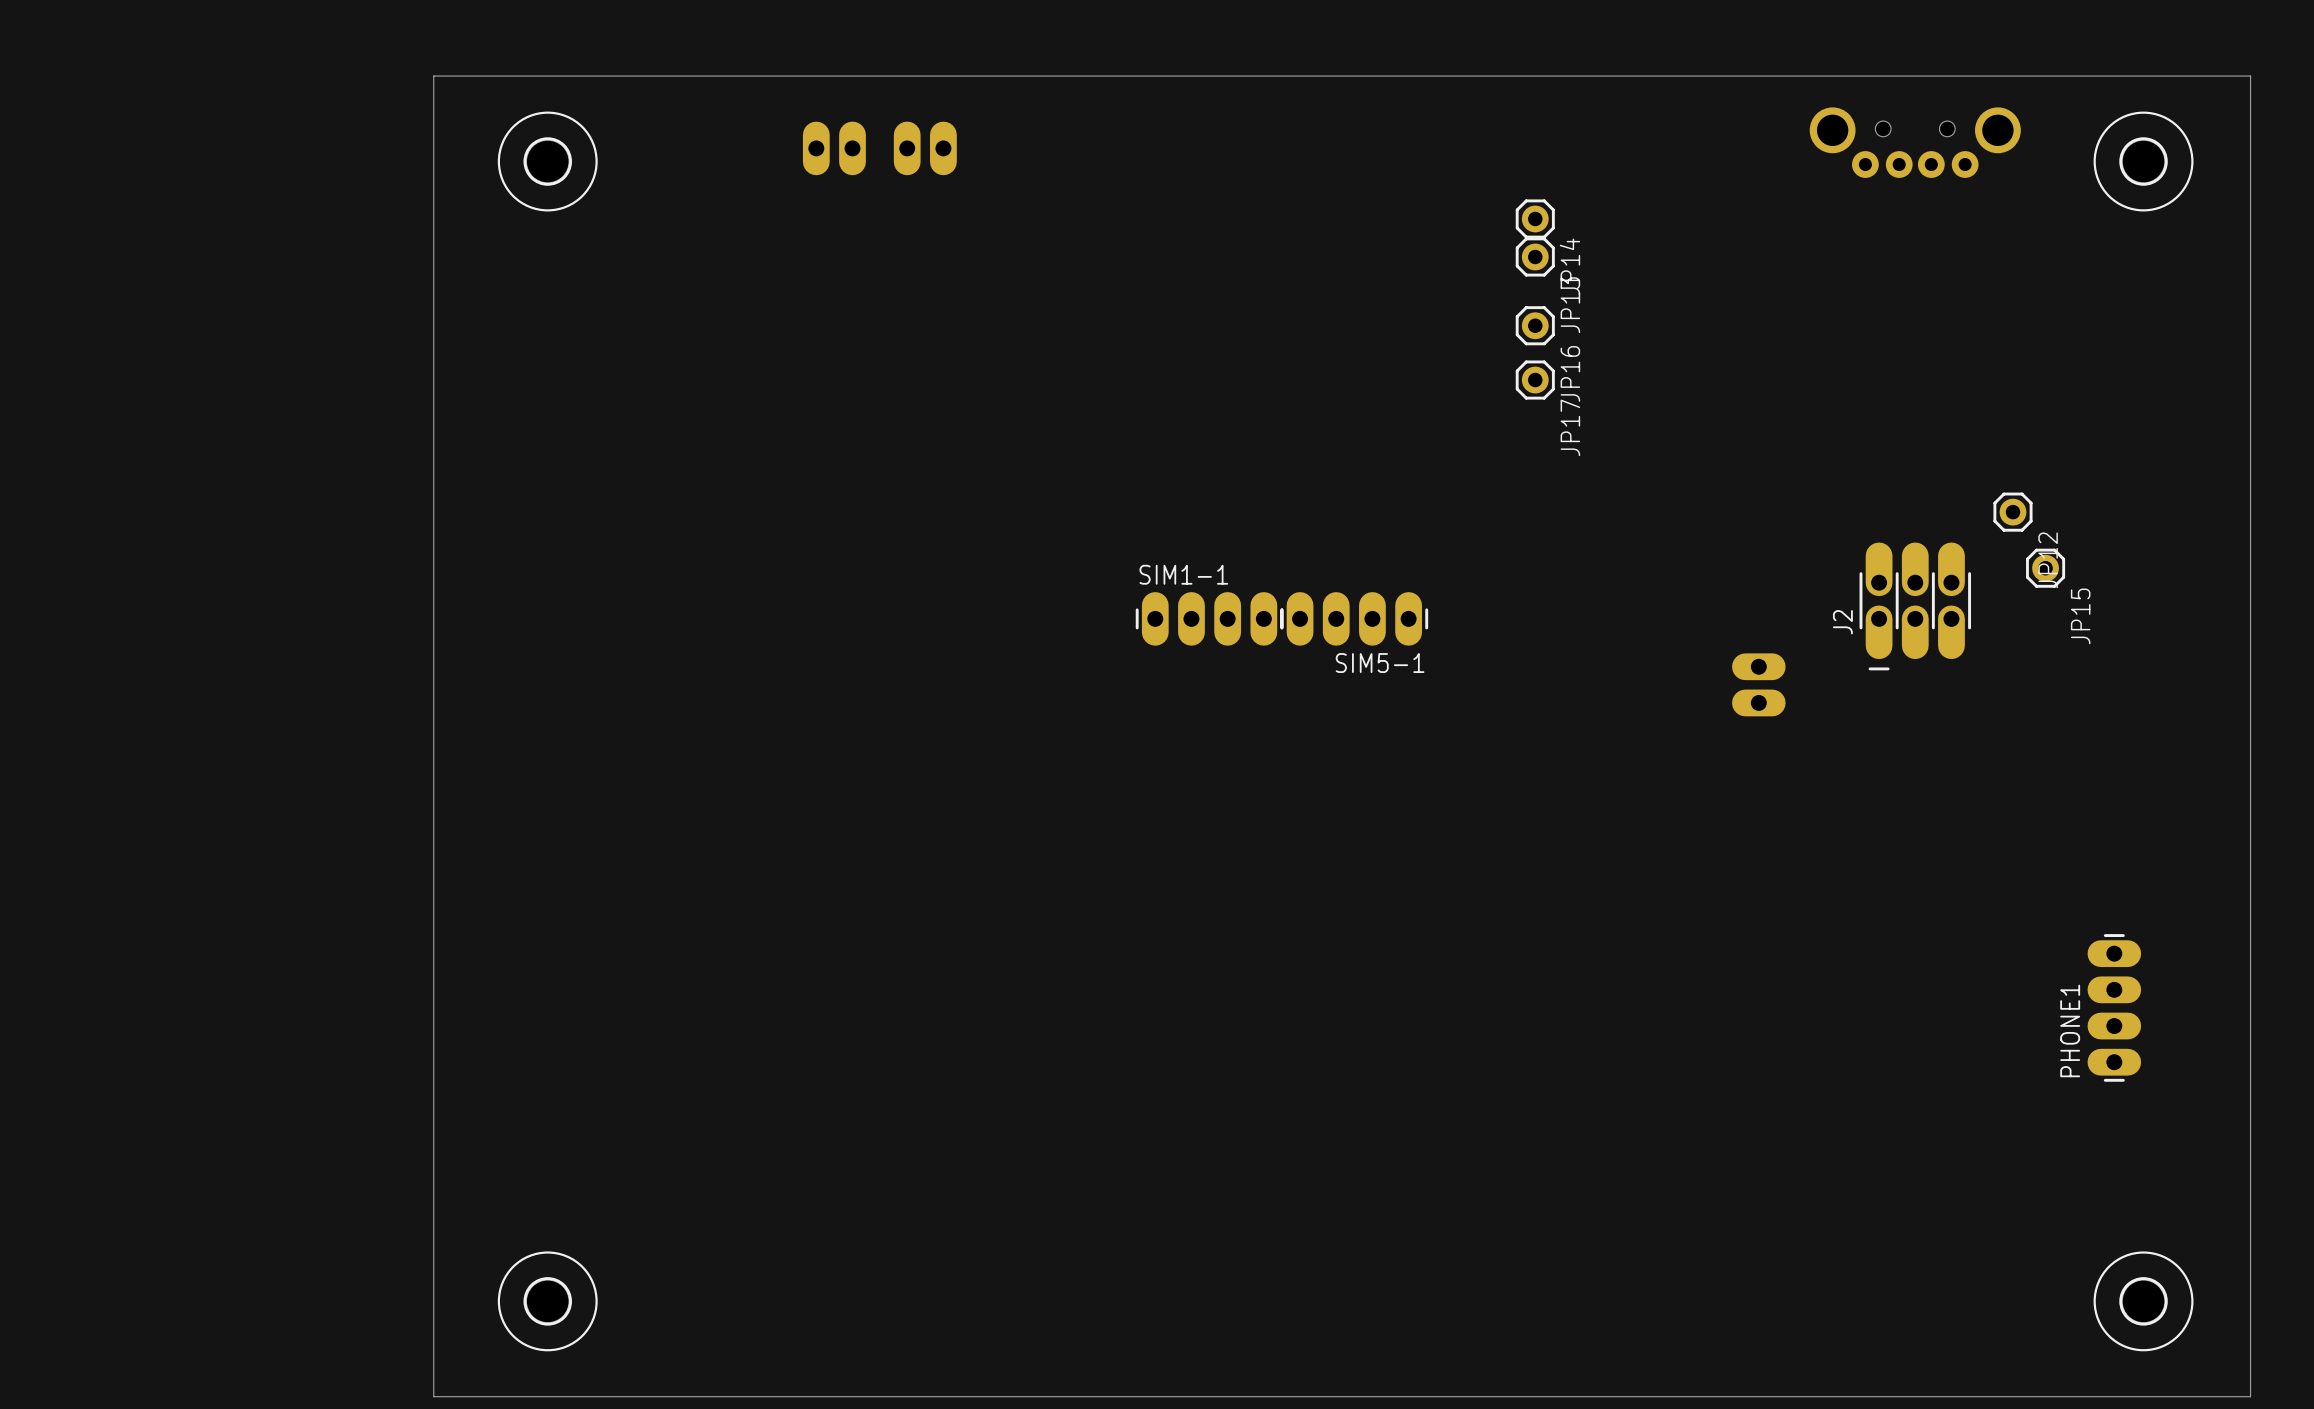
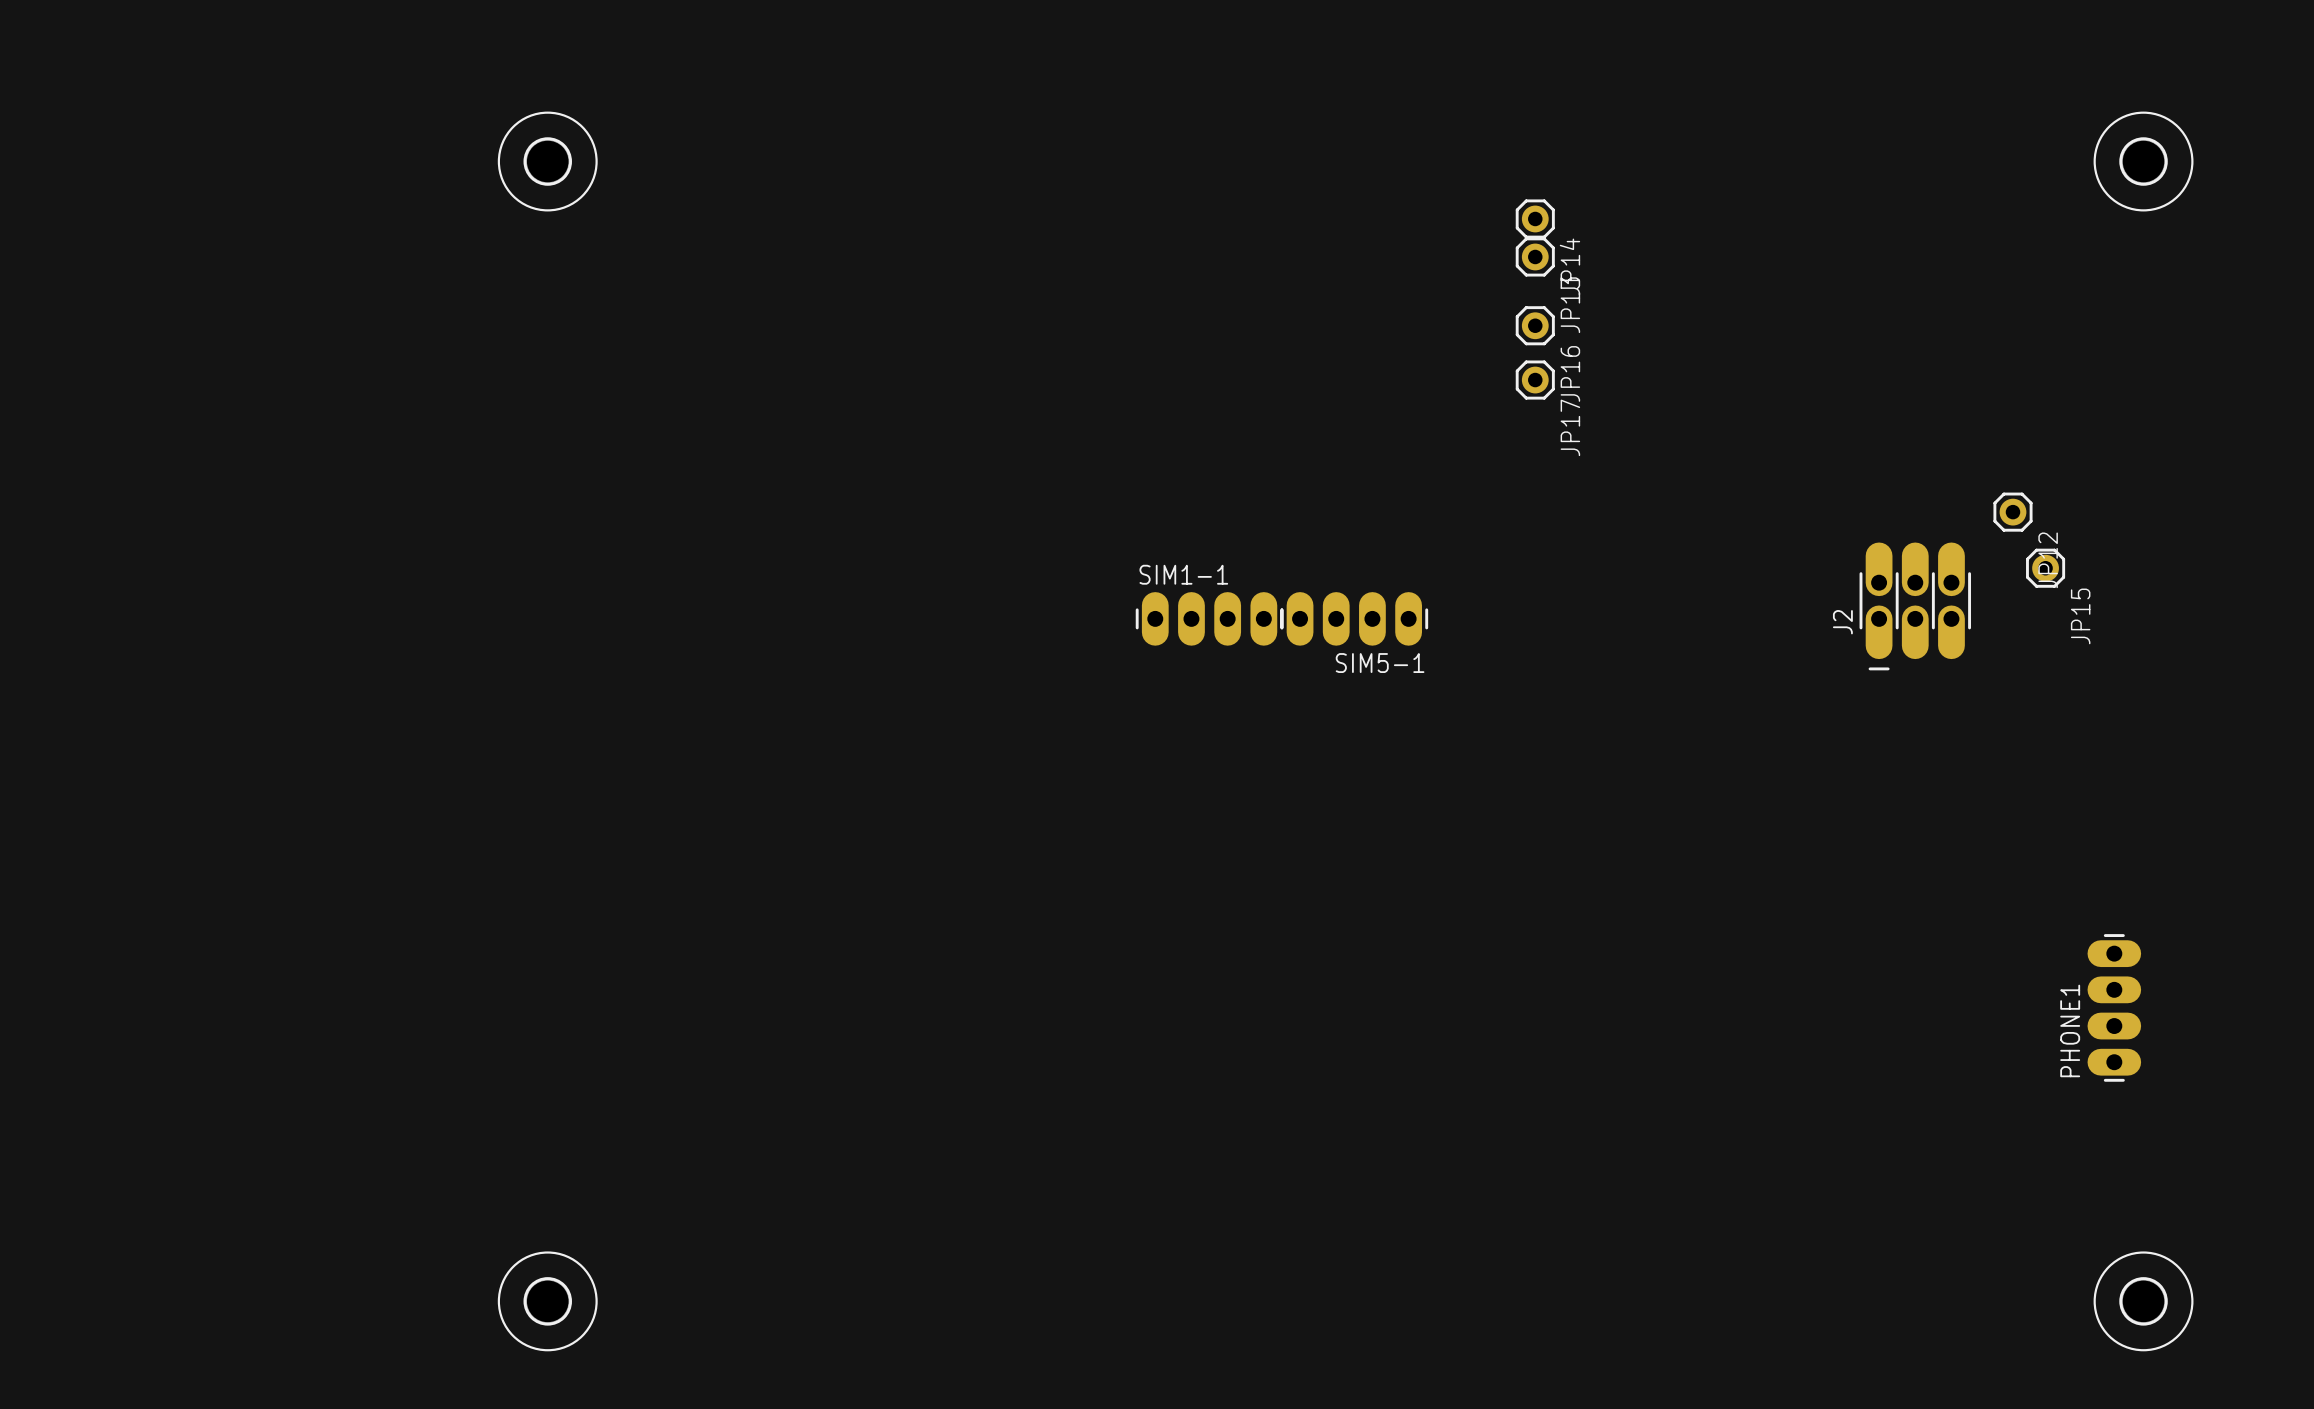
board edge: (433, 76) (433, 1396) (2250, 1396) (2250, 76) (433, 76) -> none
part: (1915, 142) -> none
part: (834, 148) -> none
part: (925, 148) -> none
part: (1758, 684) -> none

